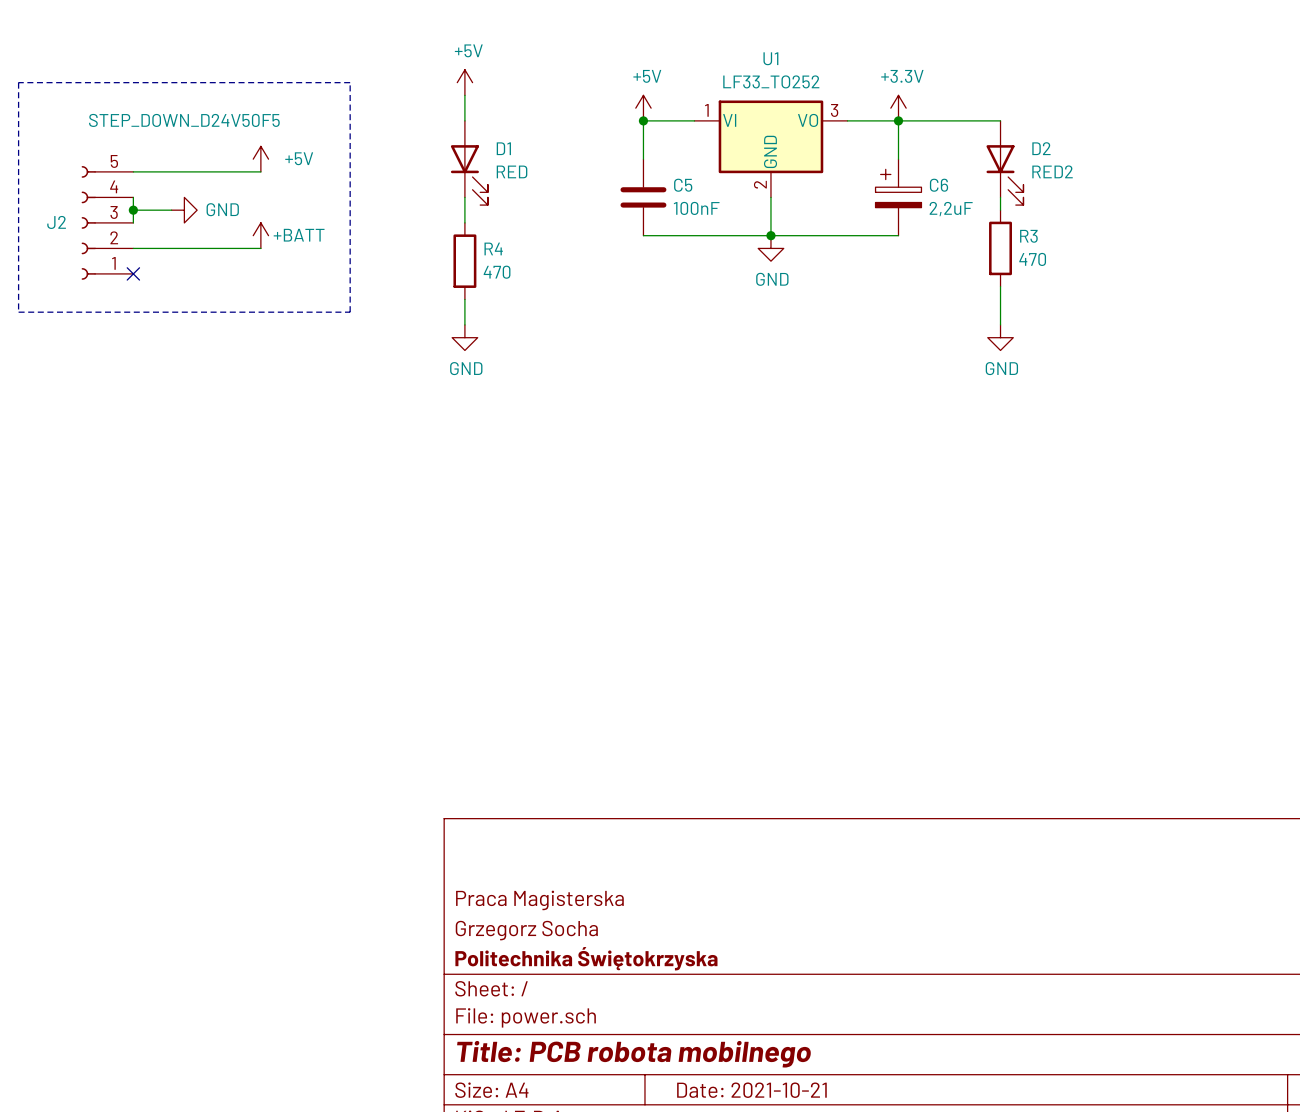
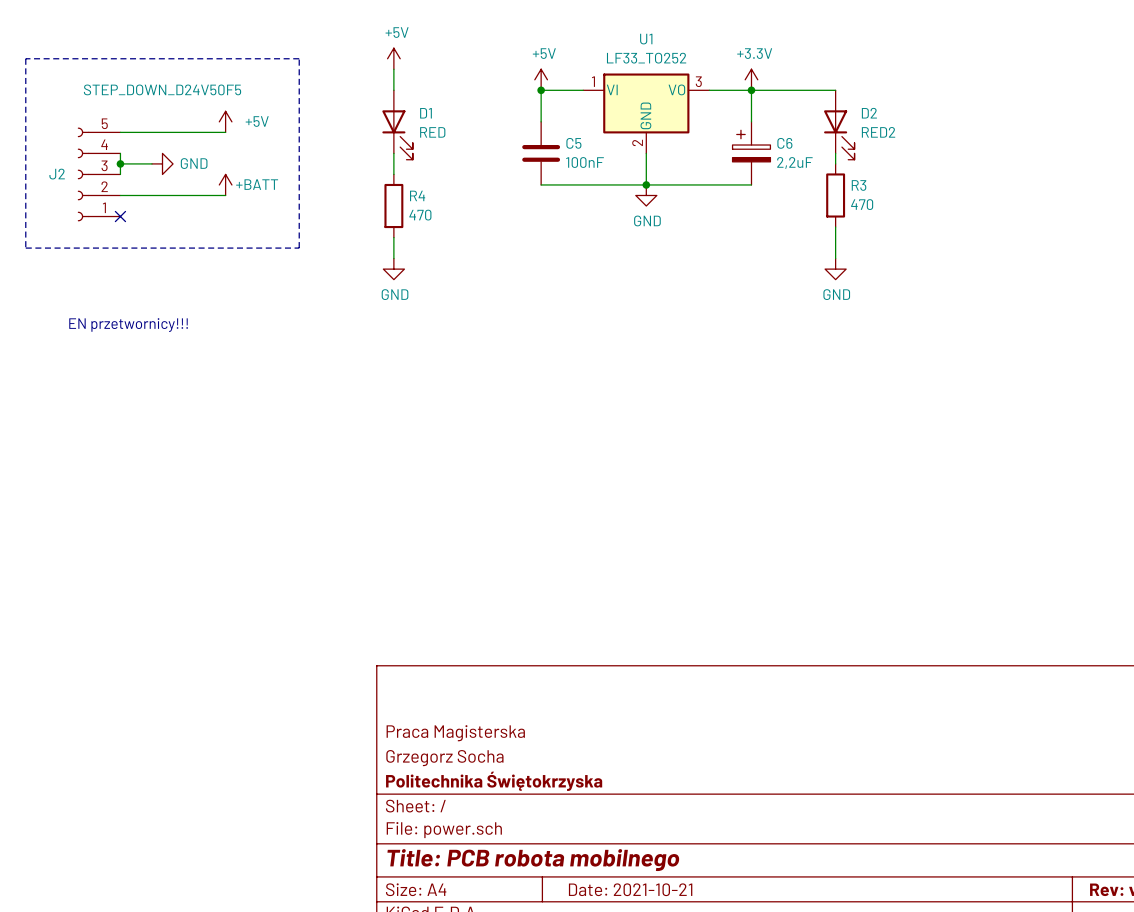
text: none -> EN przetwornicy!!! (128, 325)

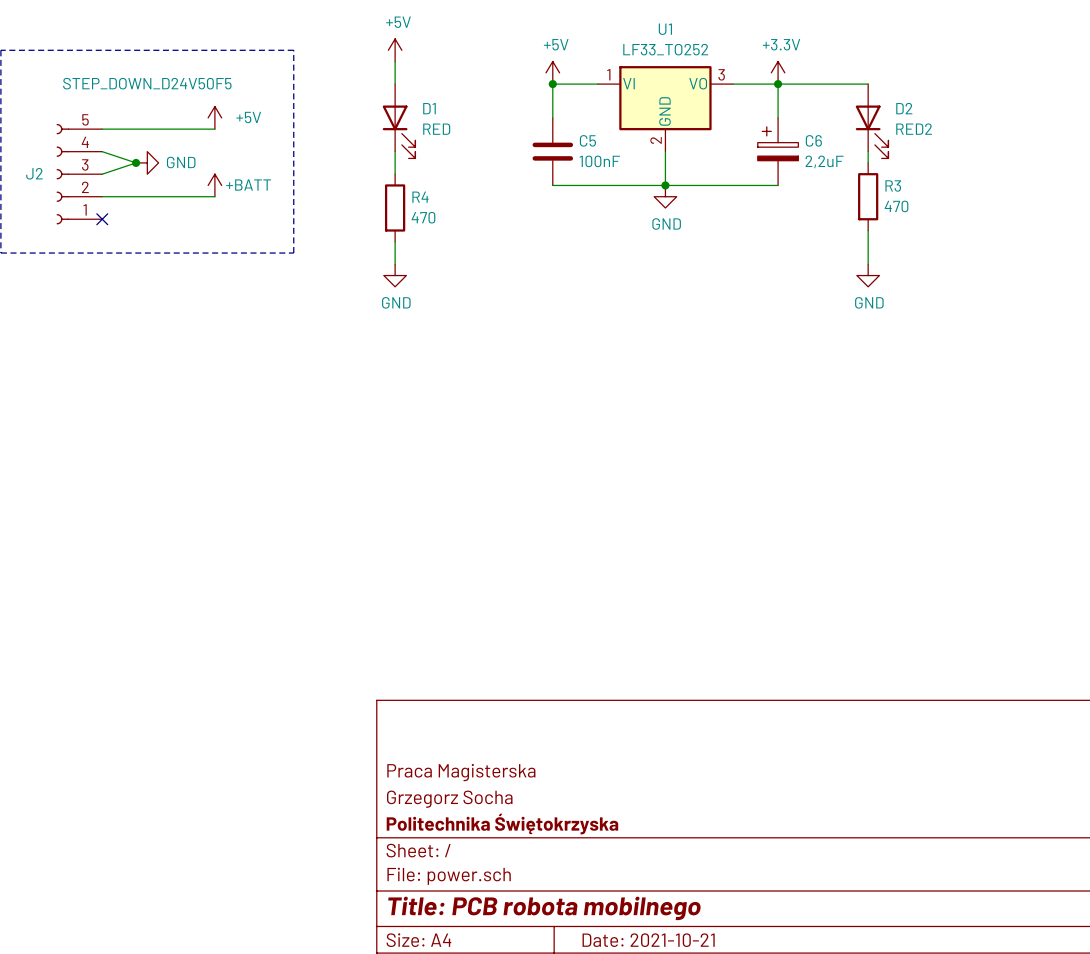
wire: (120, 153) (120, 174) -> (102, 151) (136, 162) (102, 174)
wire: (120, 163) (151, 163) -> none
junction position: (120, 163) -> (136, 162)
text: EN przetwornicy!!! (128, 325) -> none

